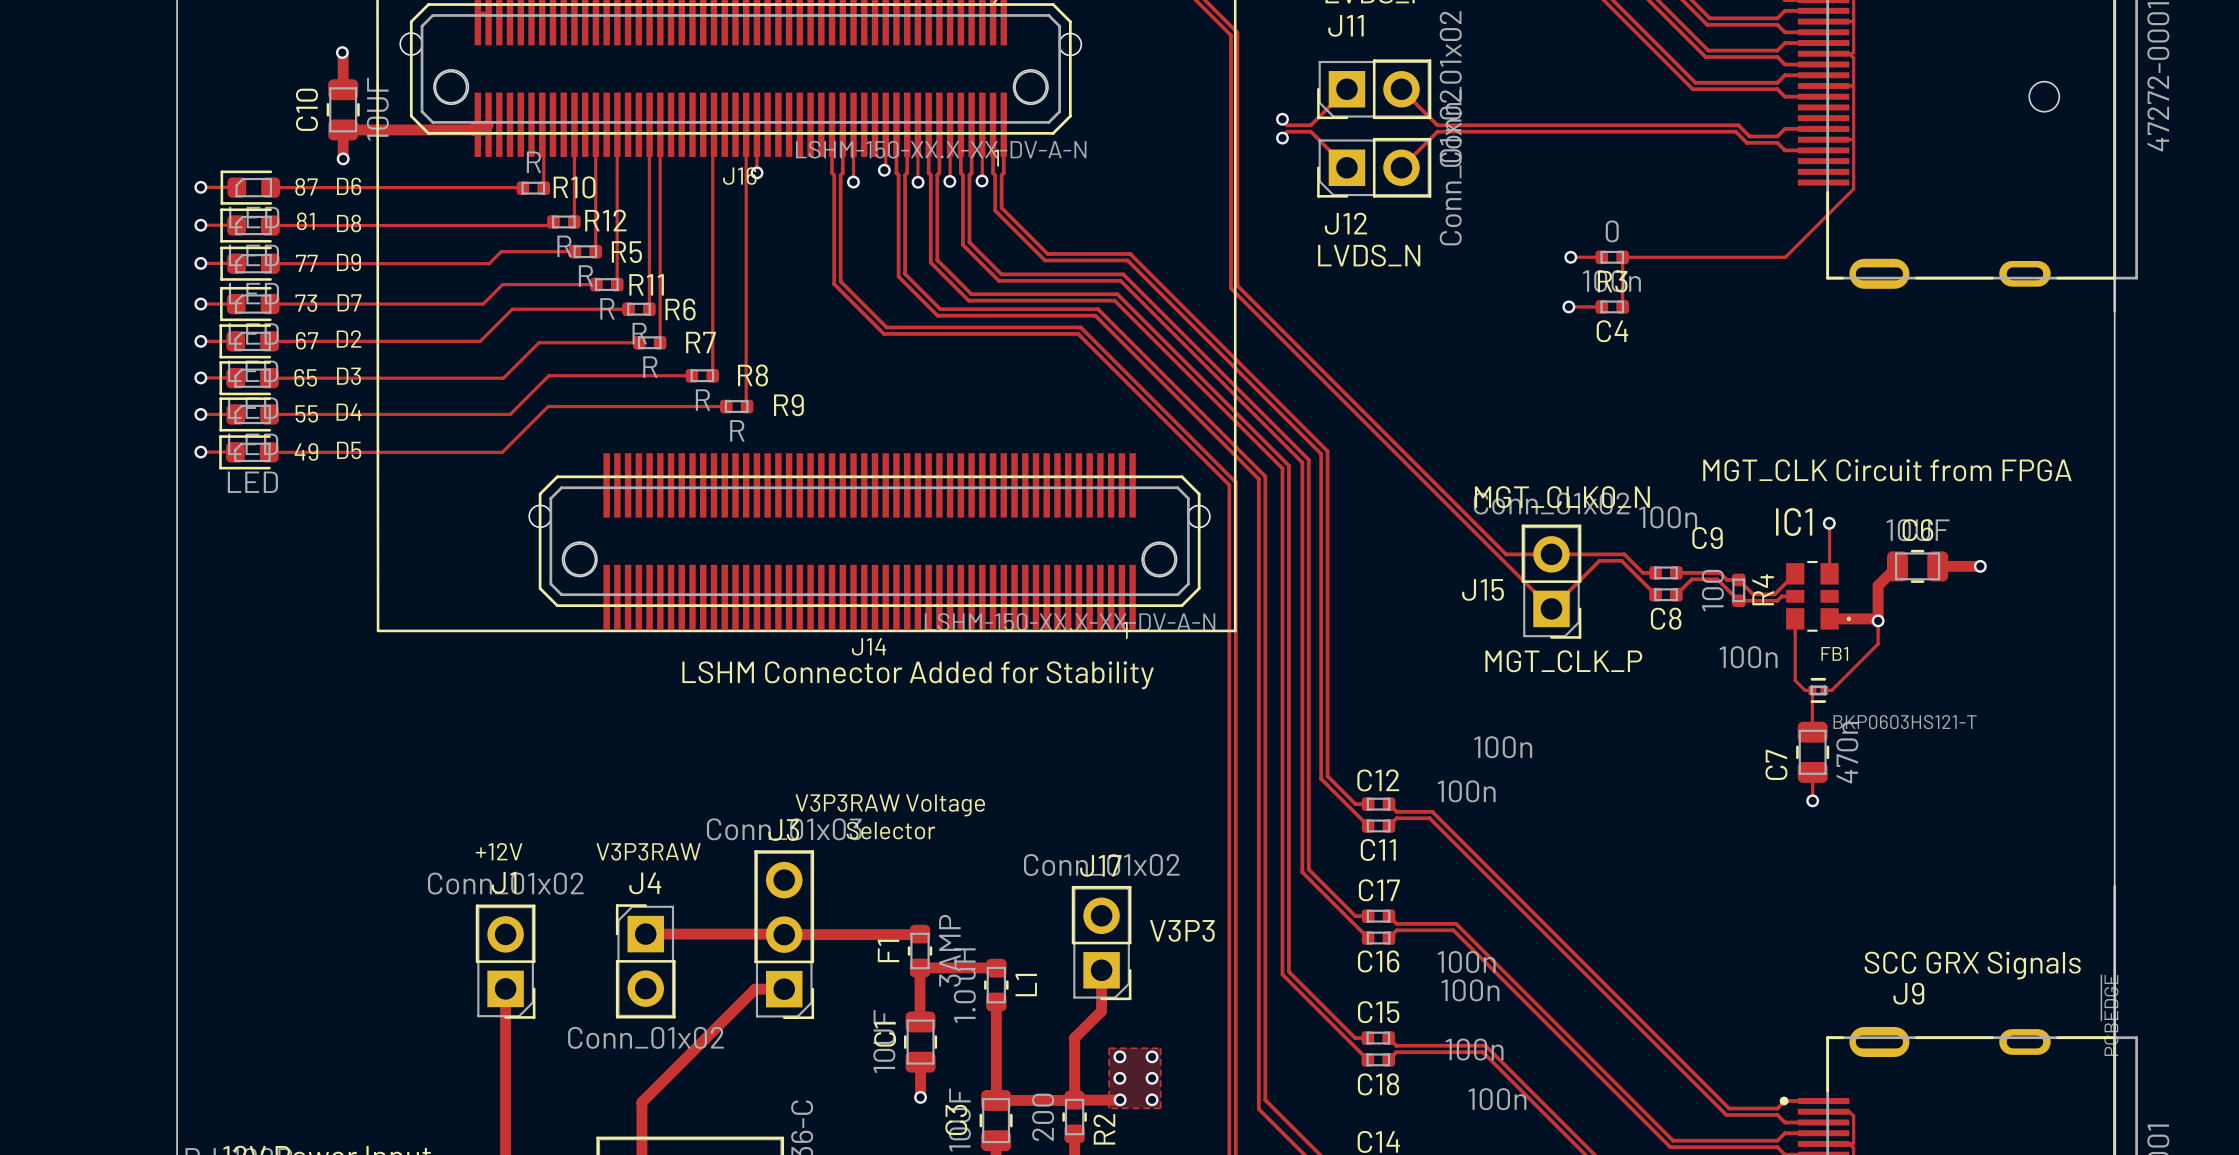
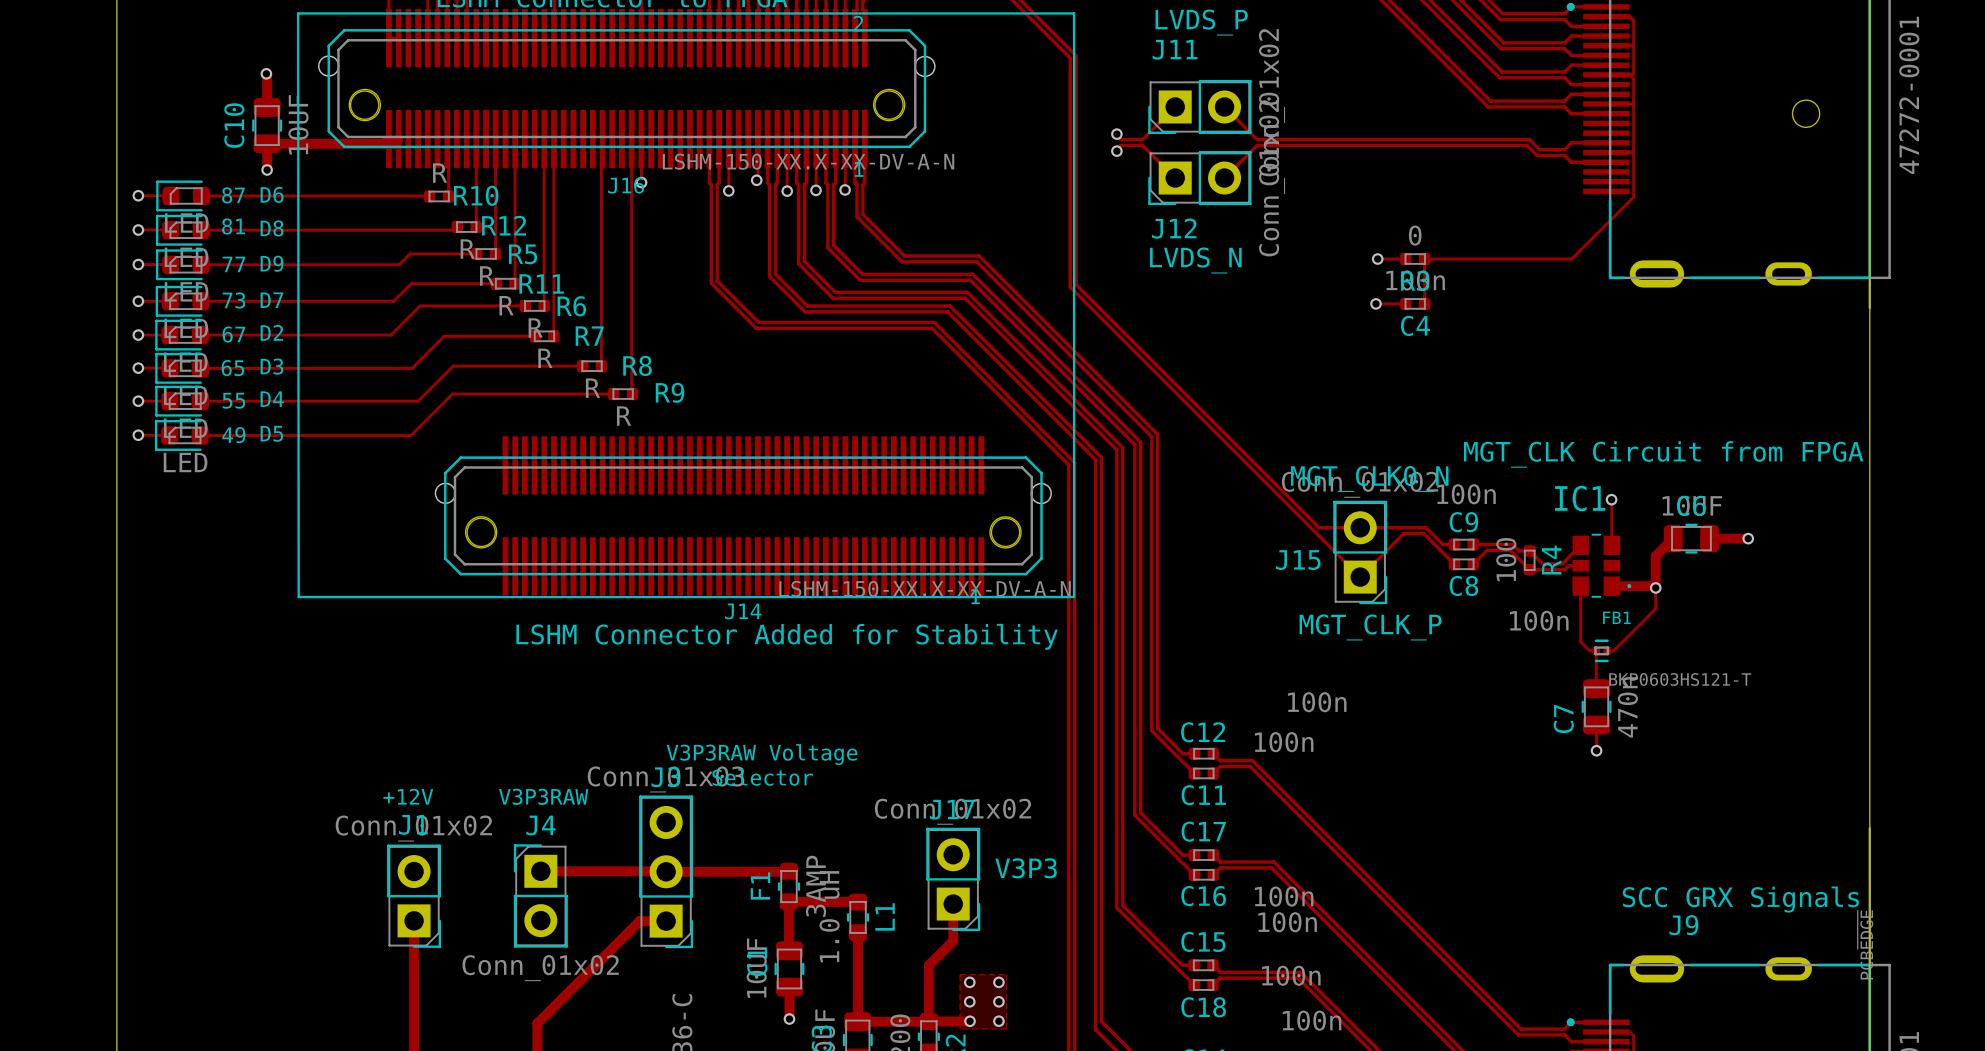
C9 name position: C9 (1707, 538) -> C9 (1463, 522)

